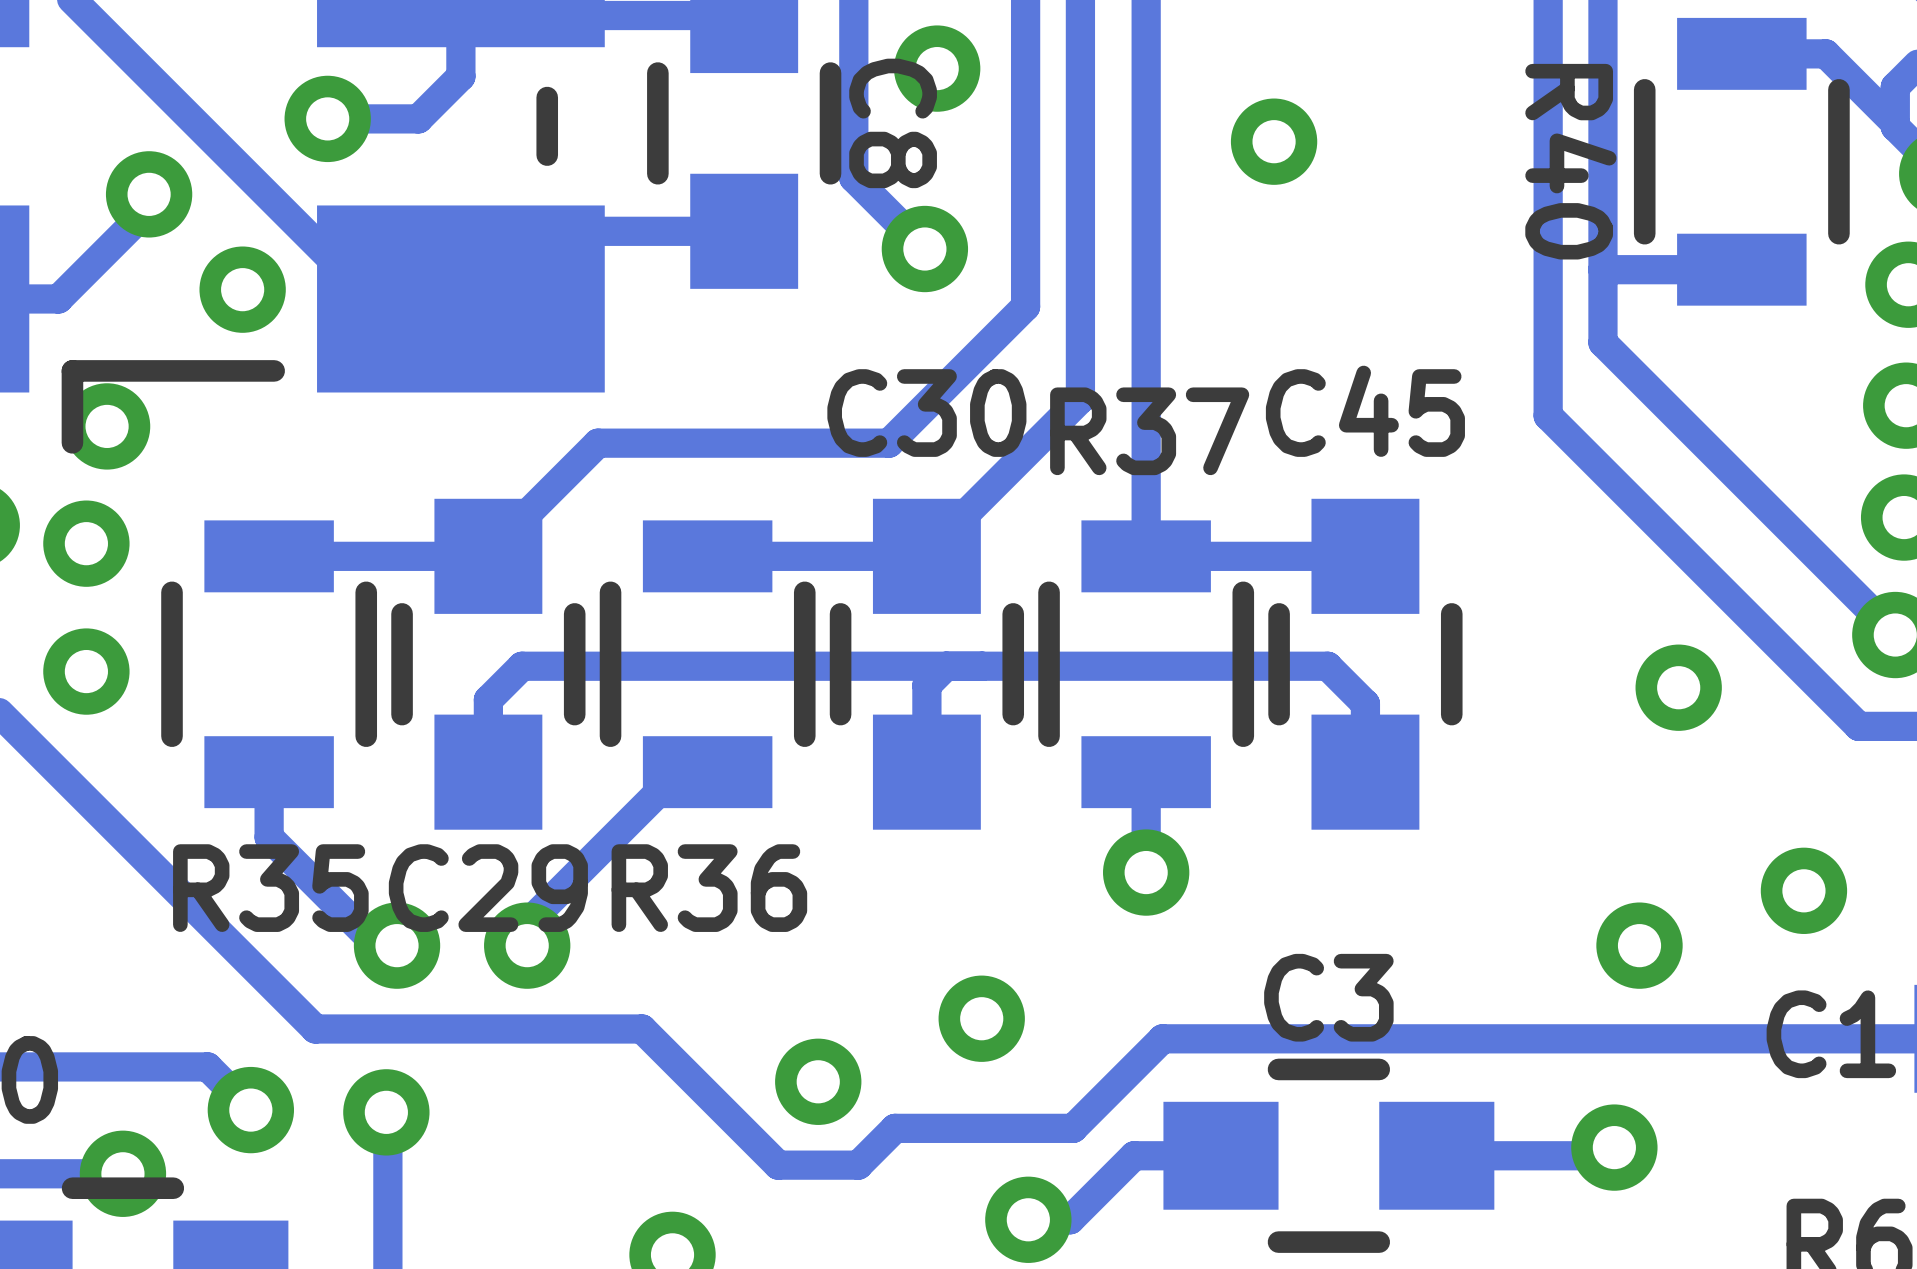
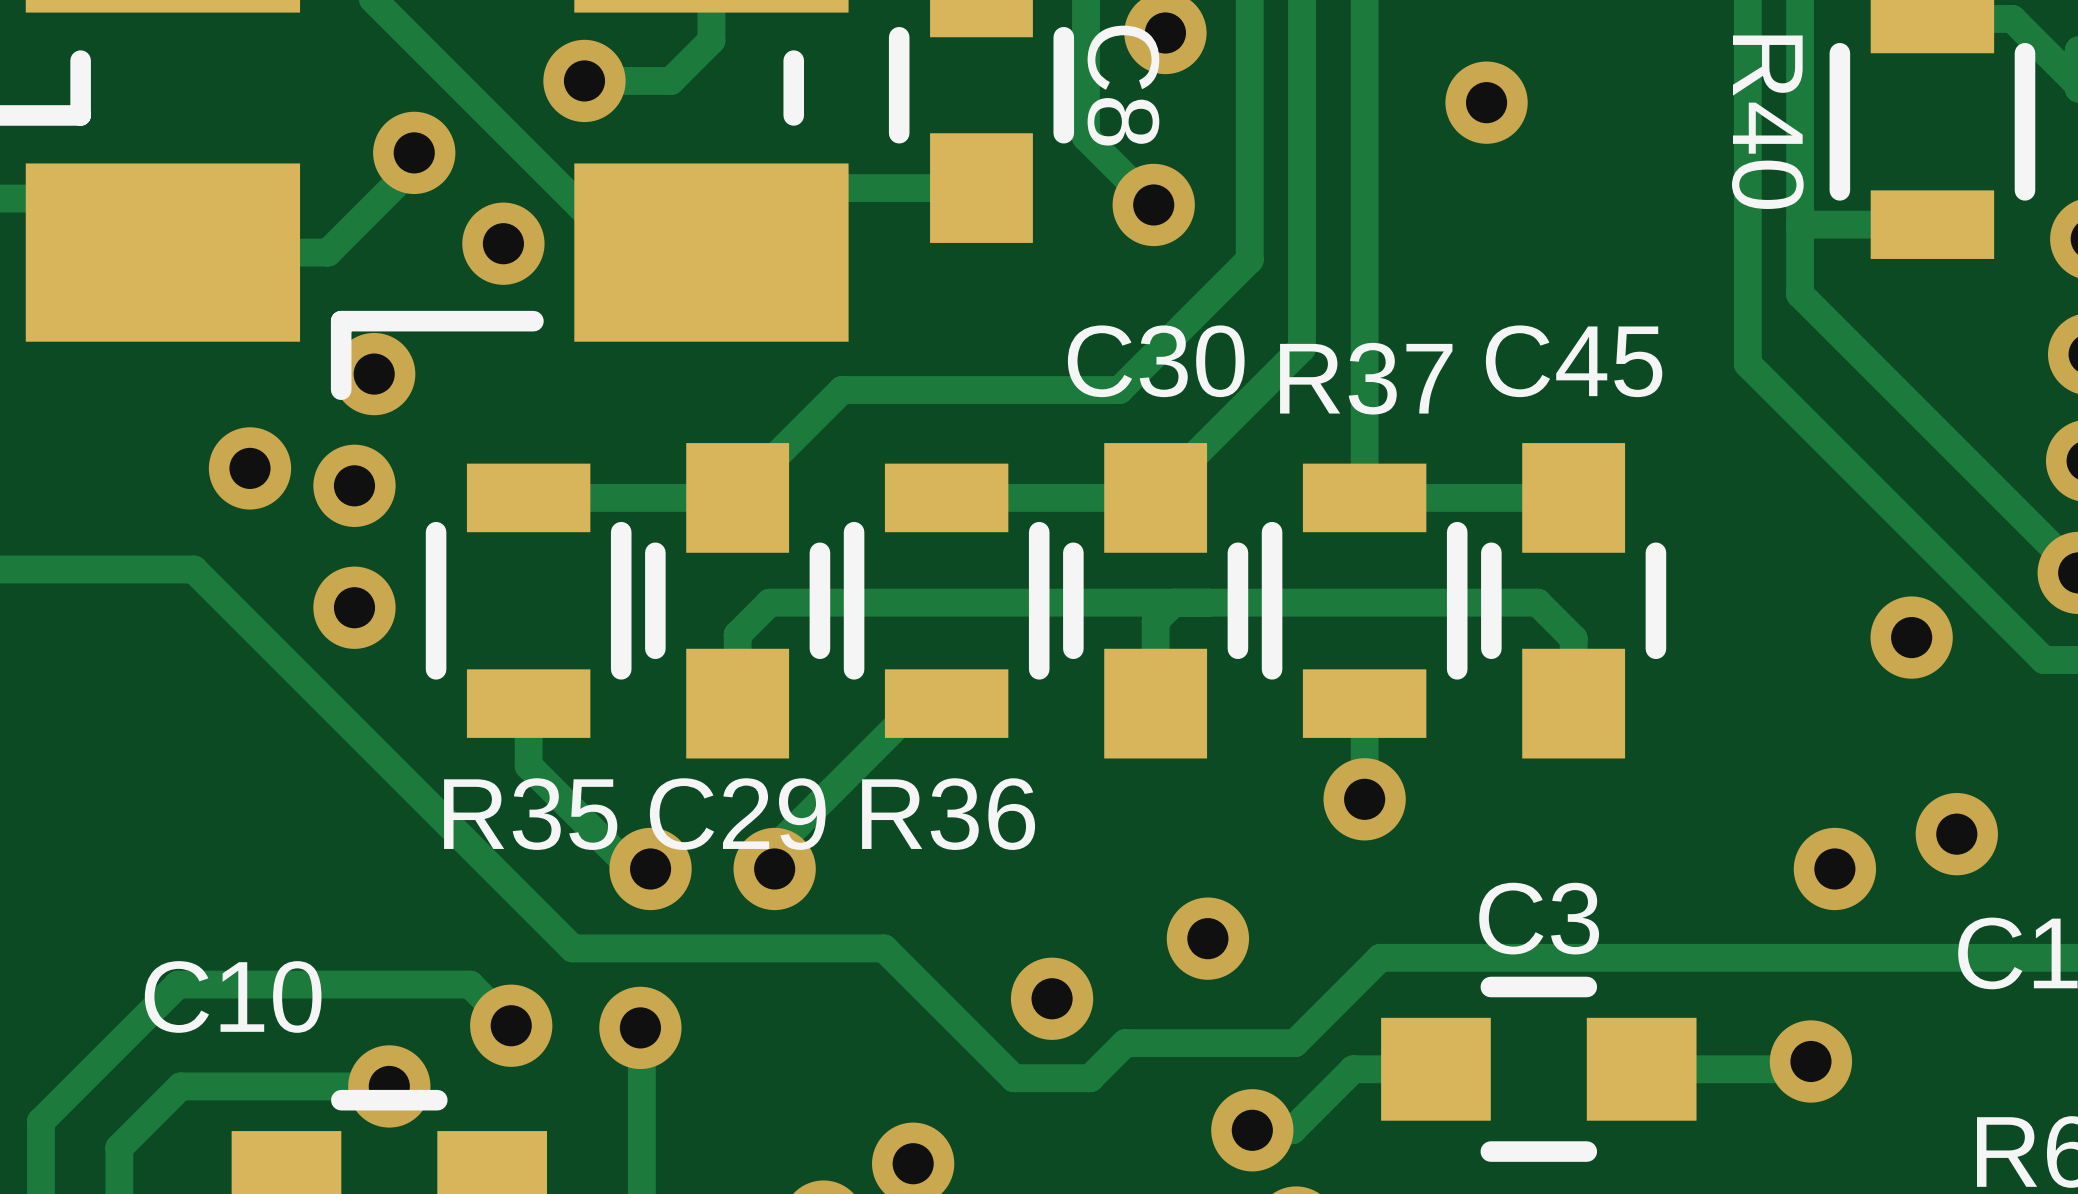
via position: (1678, 687) -> (1911, 637)
via position: (1803, 890) -> (1956, 834)

